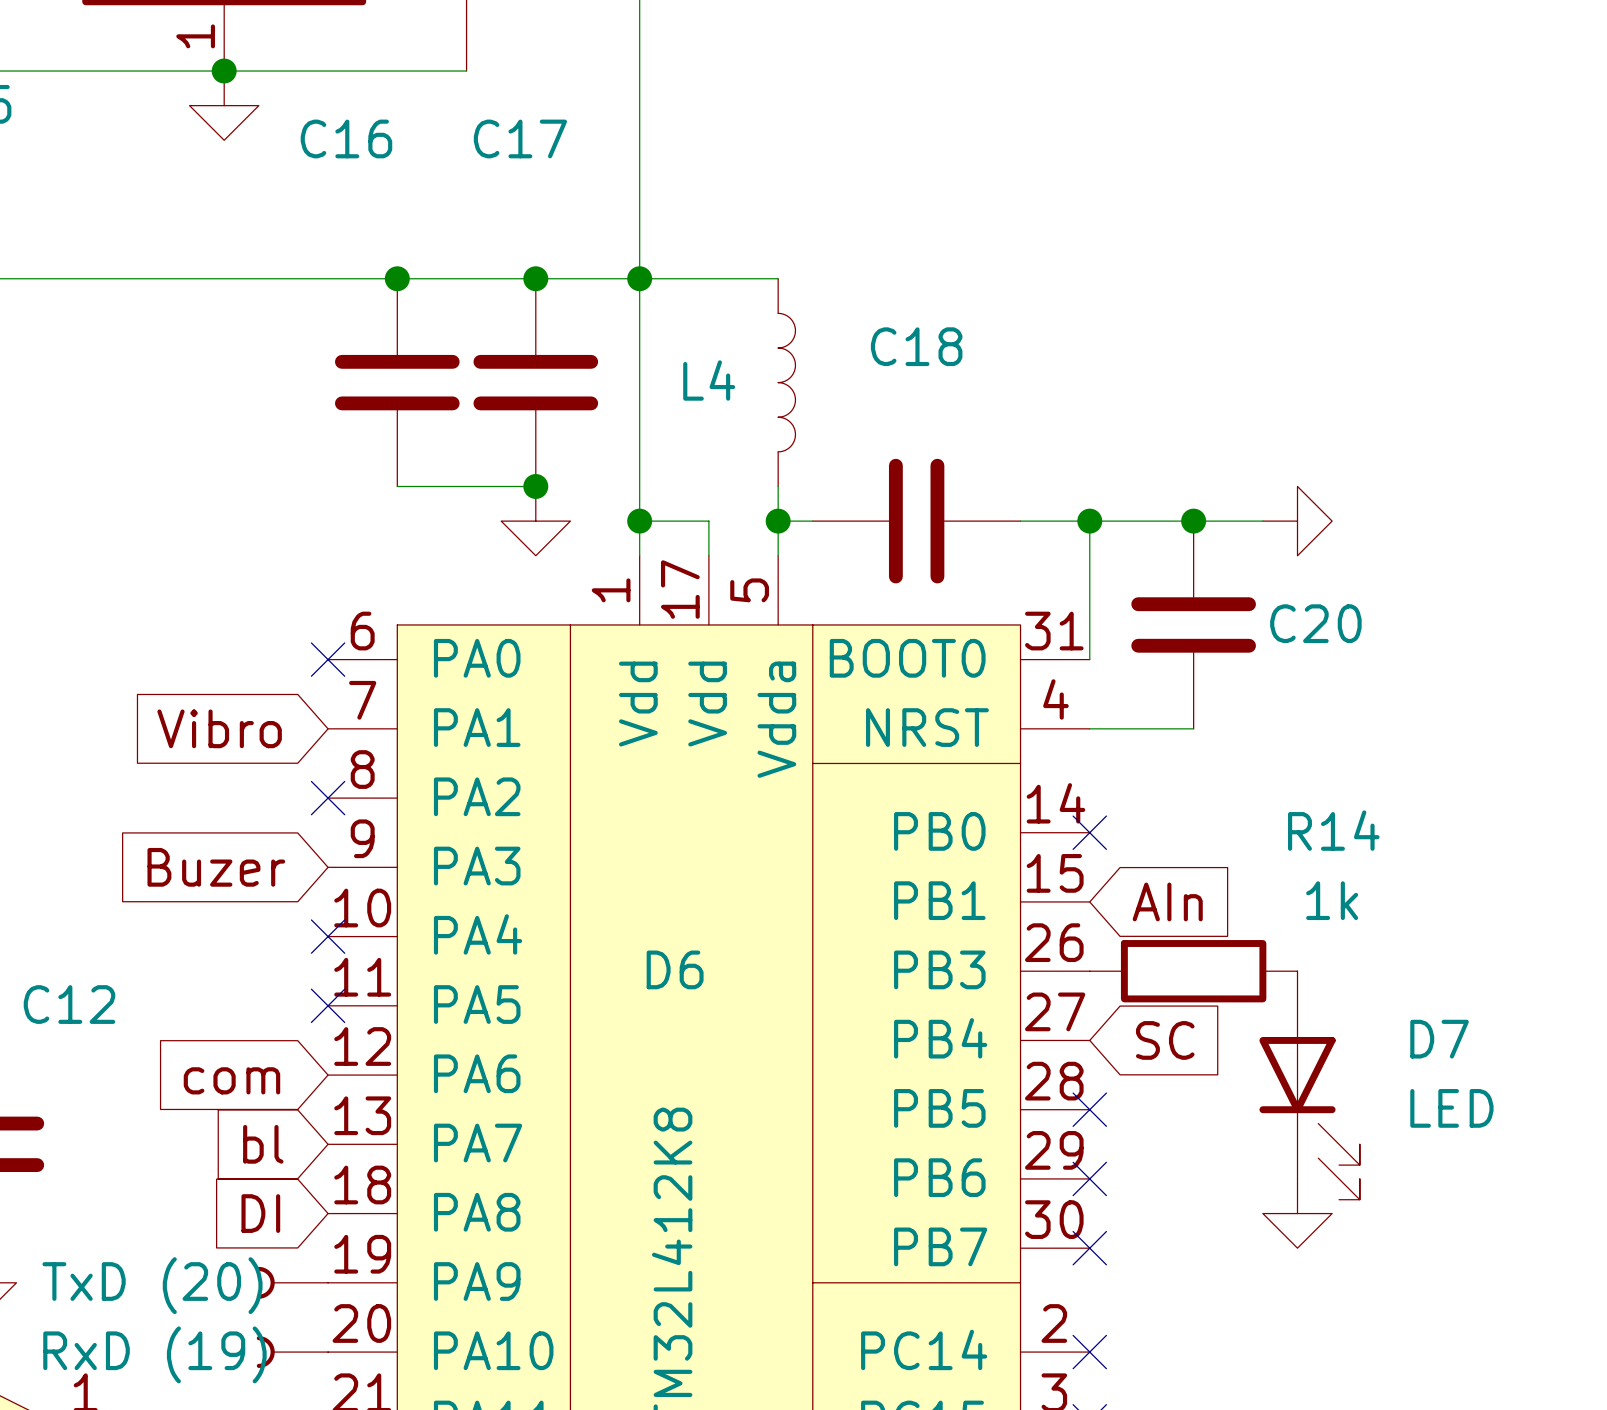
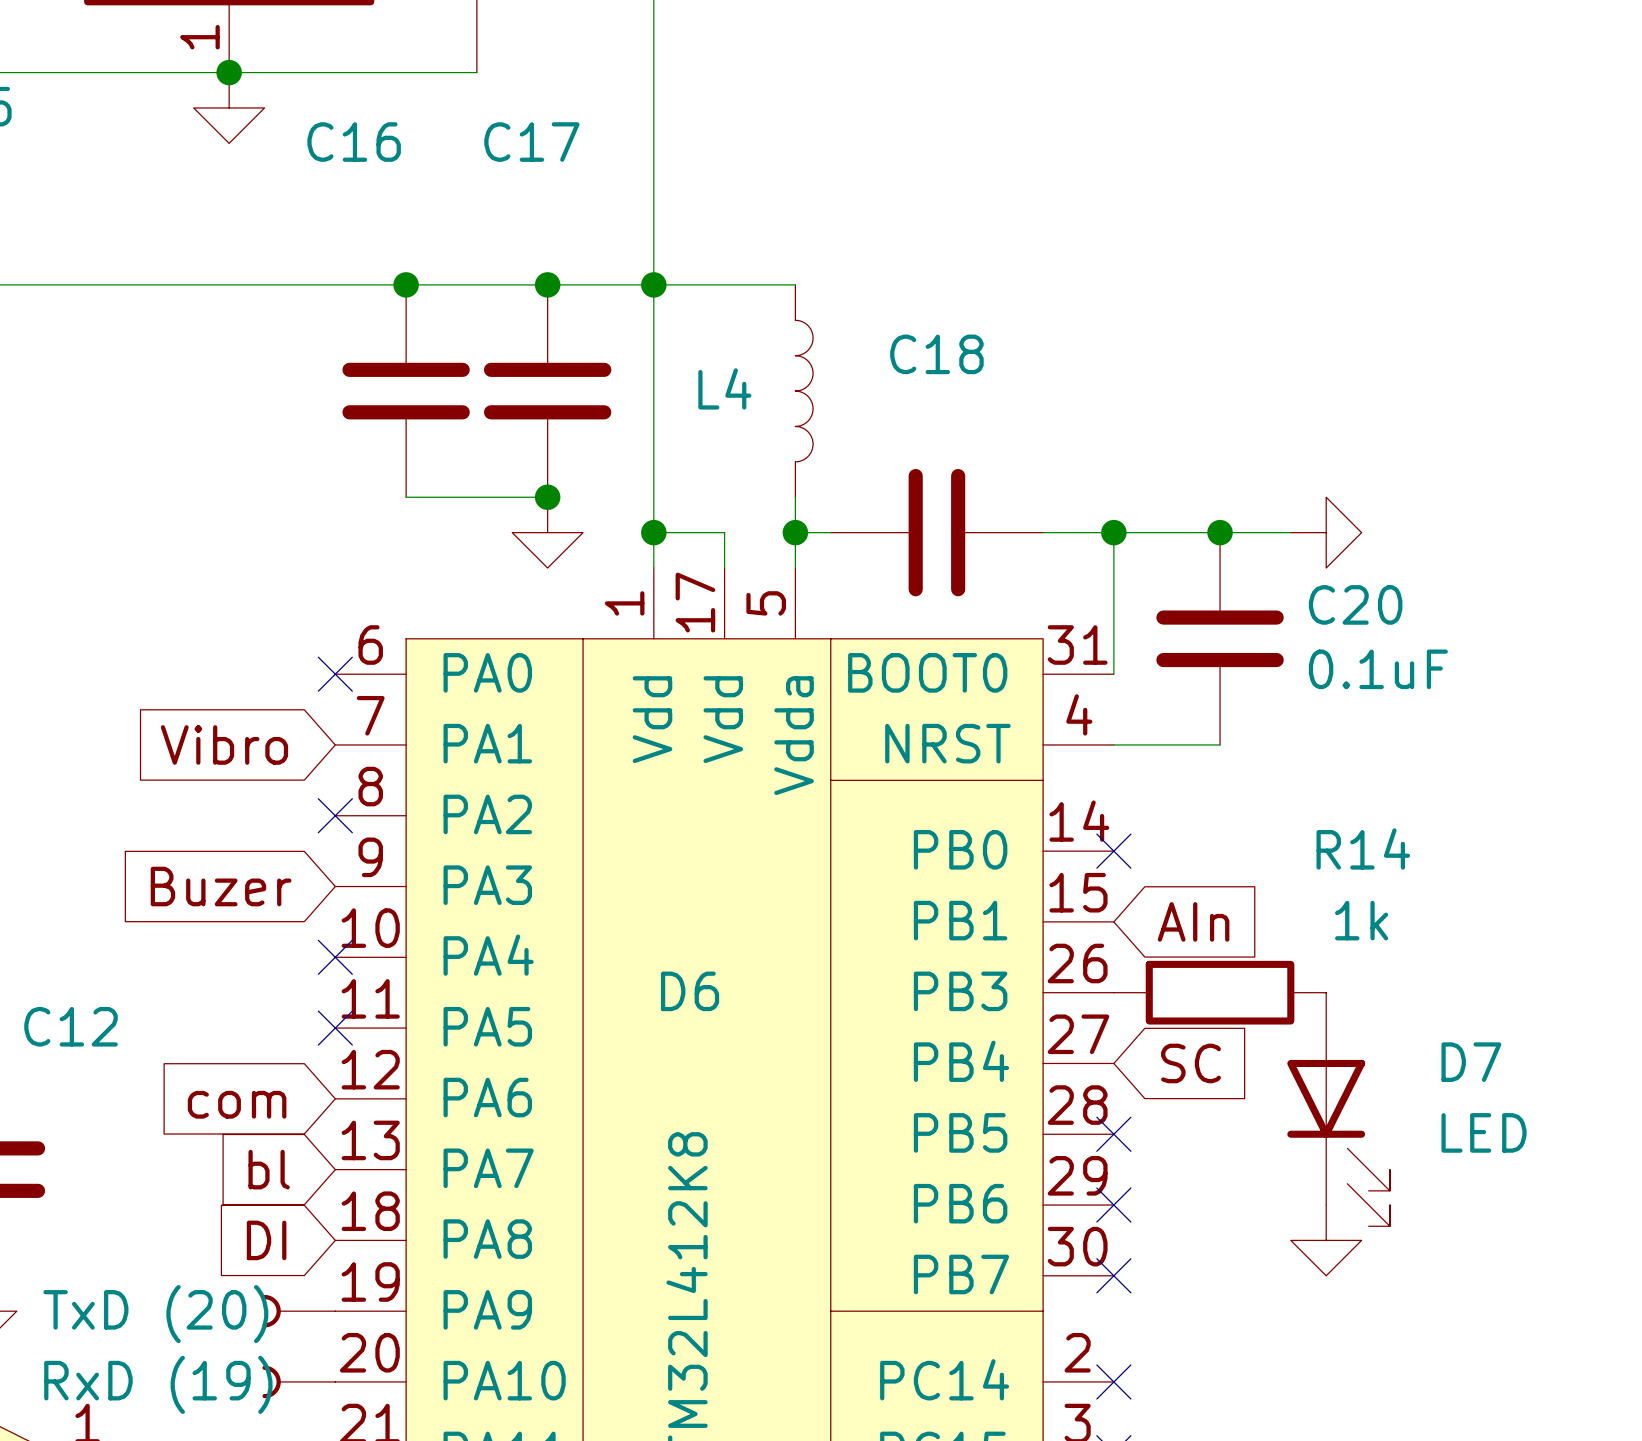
C20 name position: C20 (1315, 623) -> C20 (1355, 604)
C20 value: none -> 0.1uF (1378, 669)

